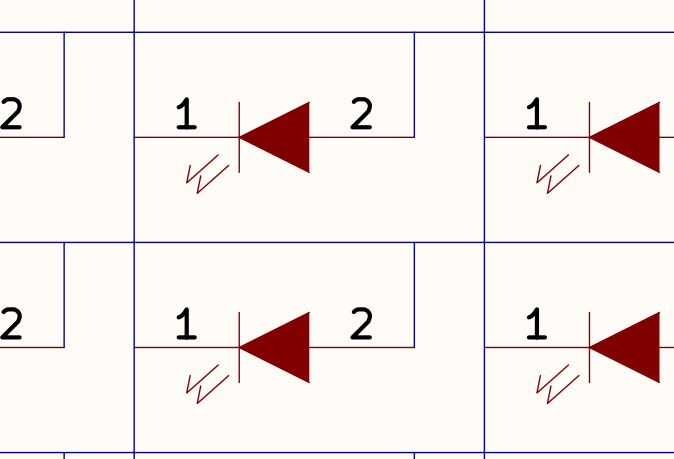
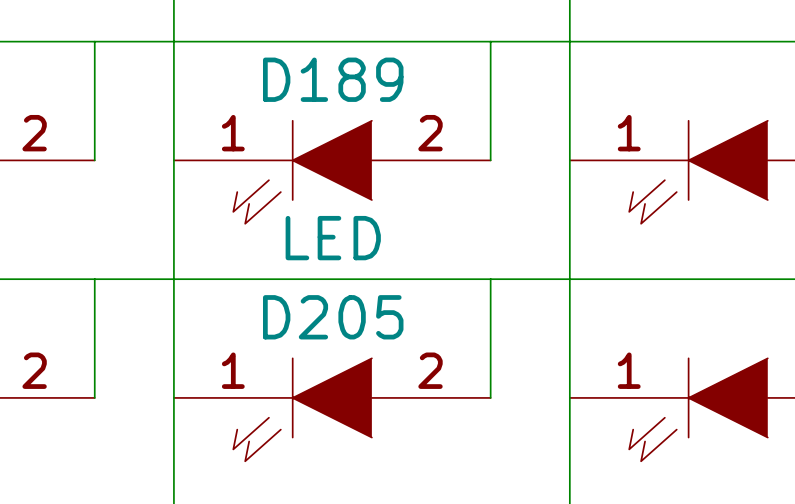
D189 name: none -> D189 (333, 79)
D189 value: none -> LED (333, 238)
D205 name: none -> D205 (333, 317)

